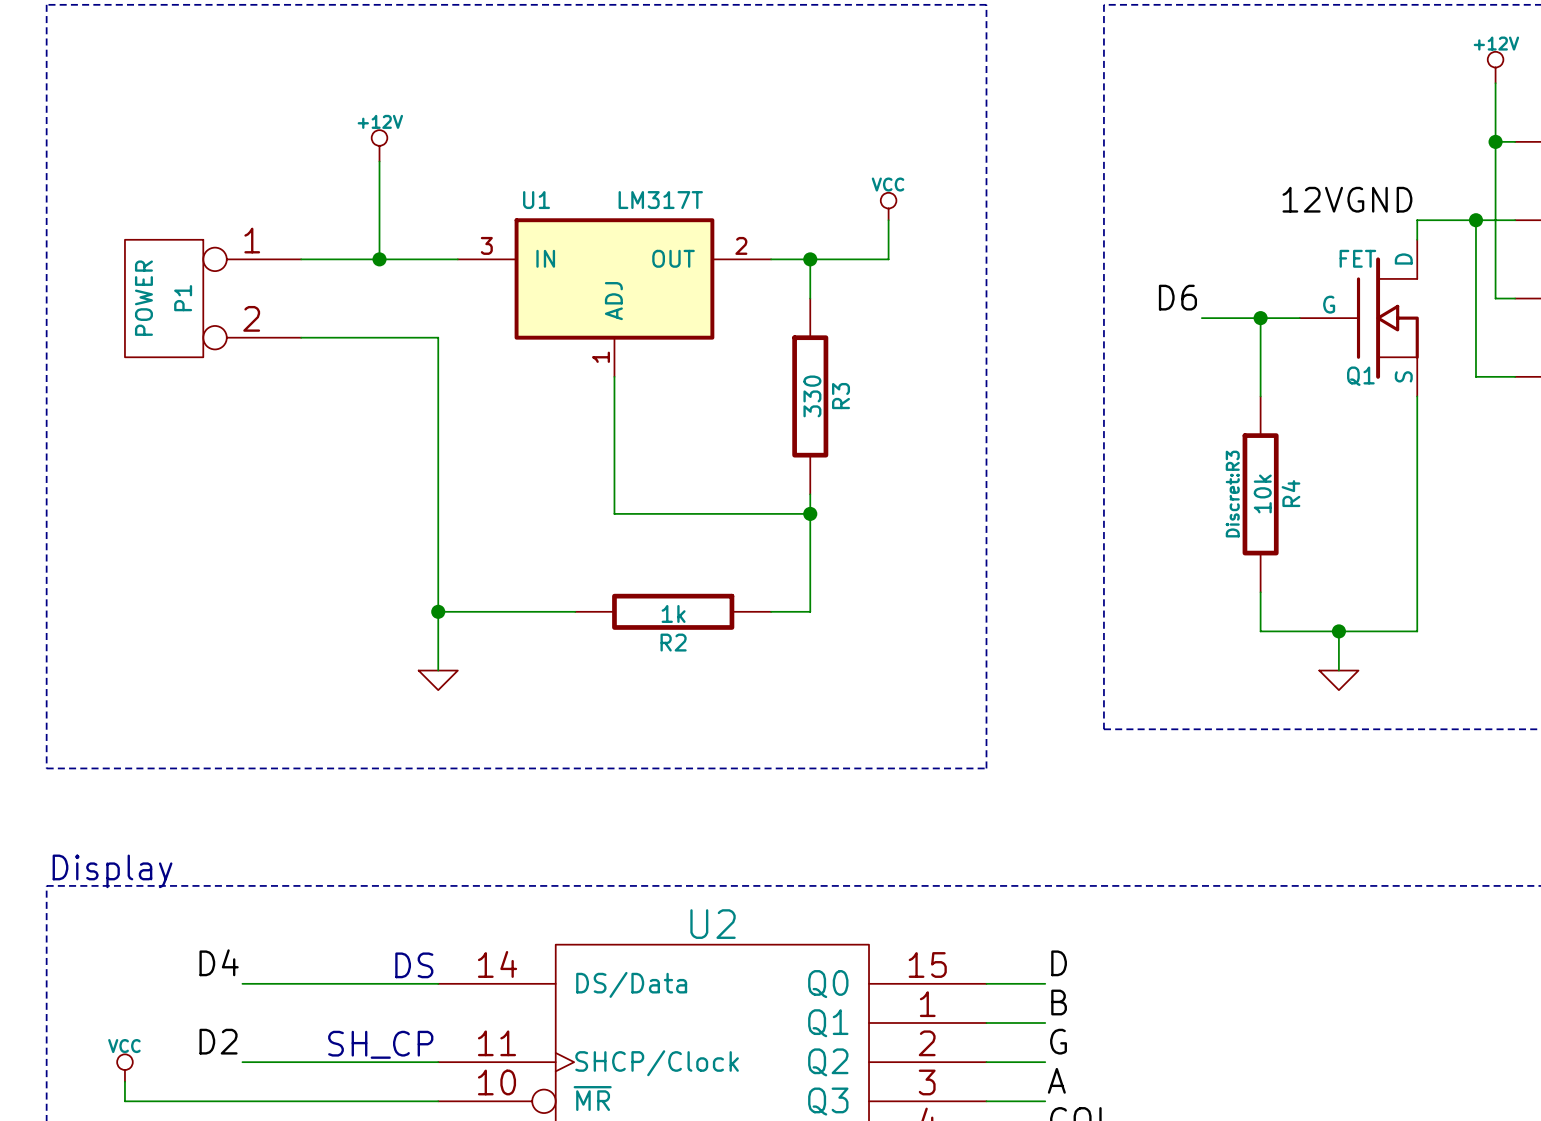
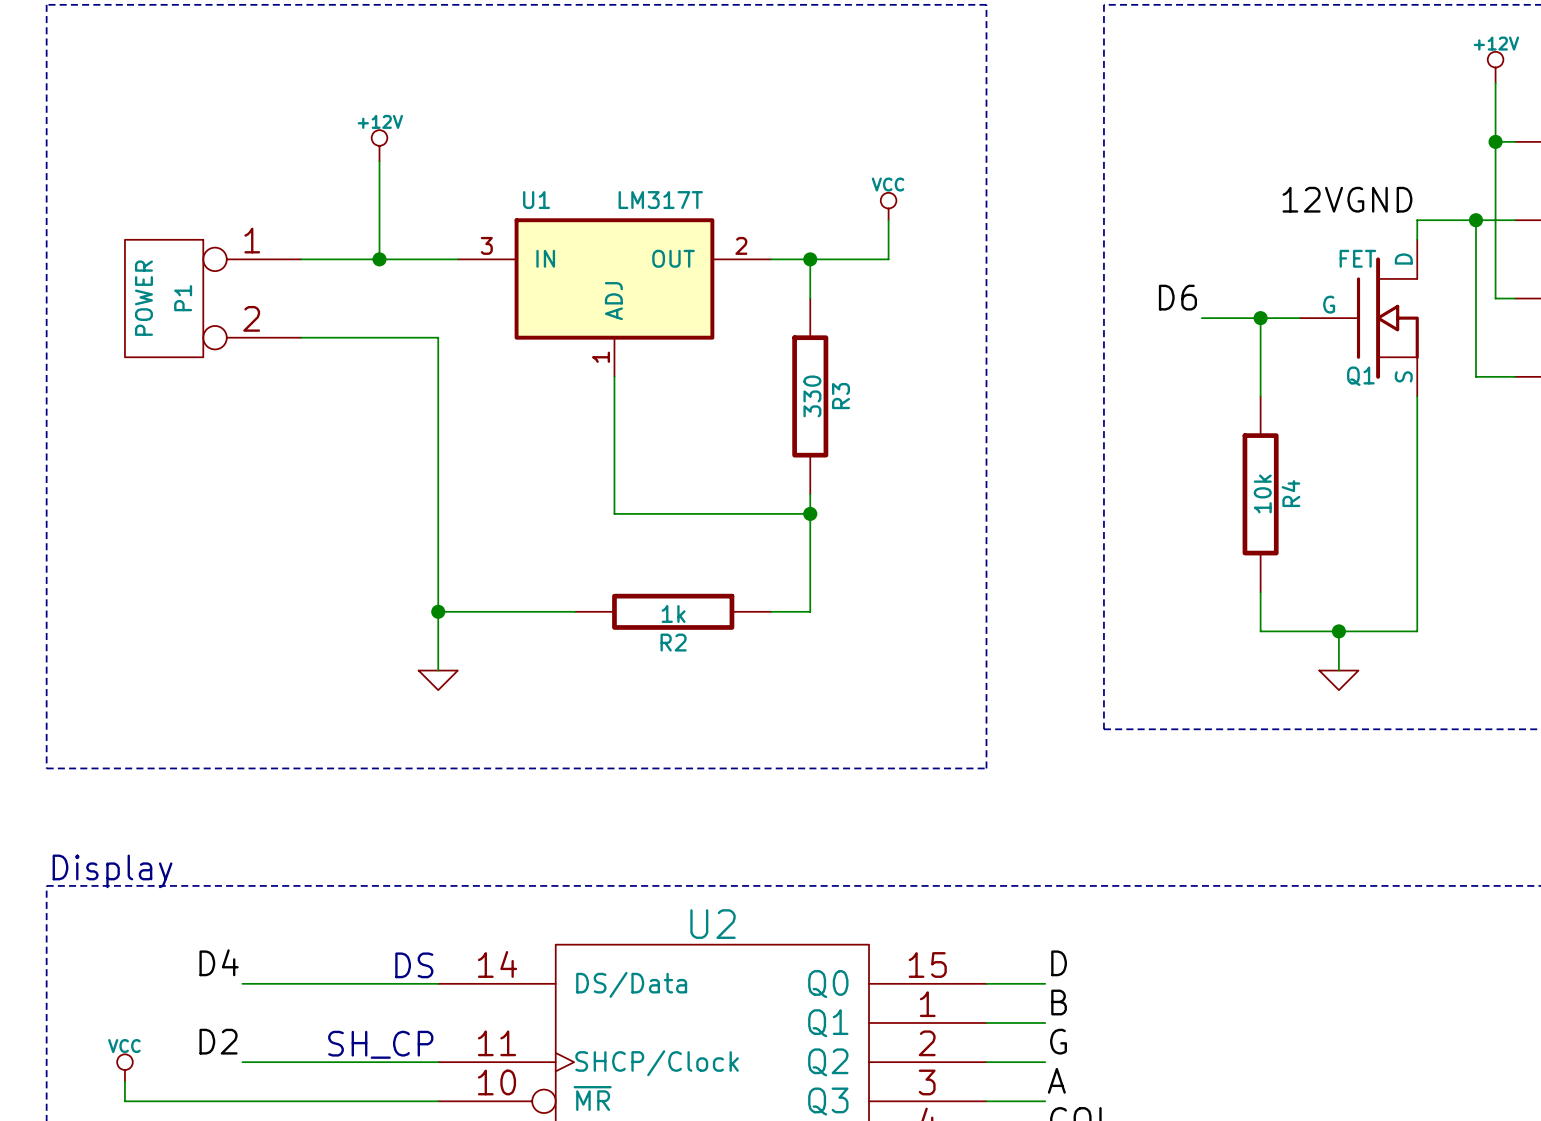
R4 text: Discret:R3 (1232, 494) -> none

